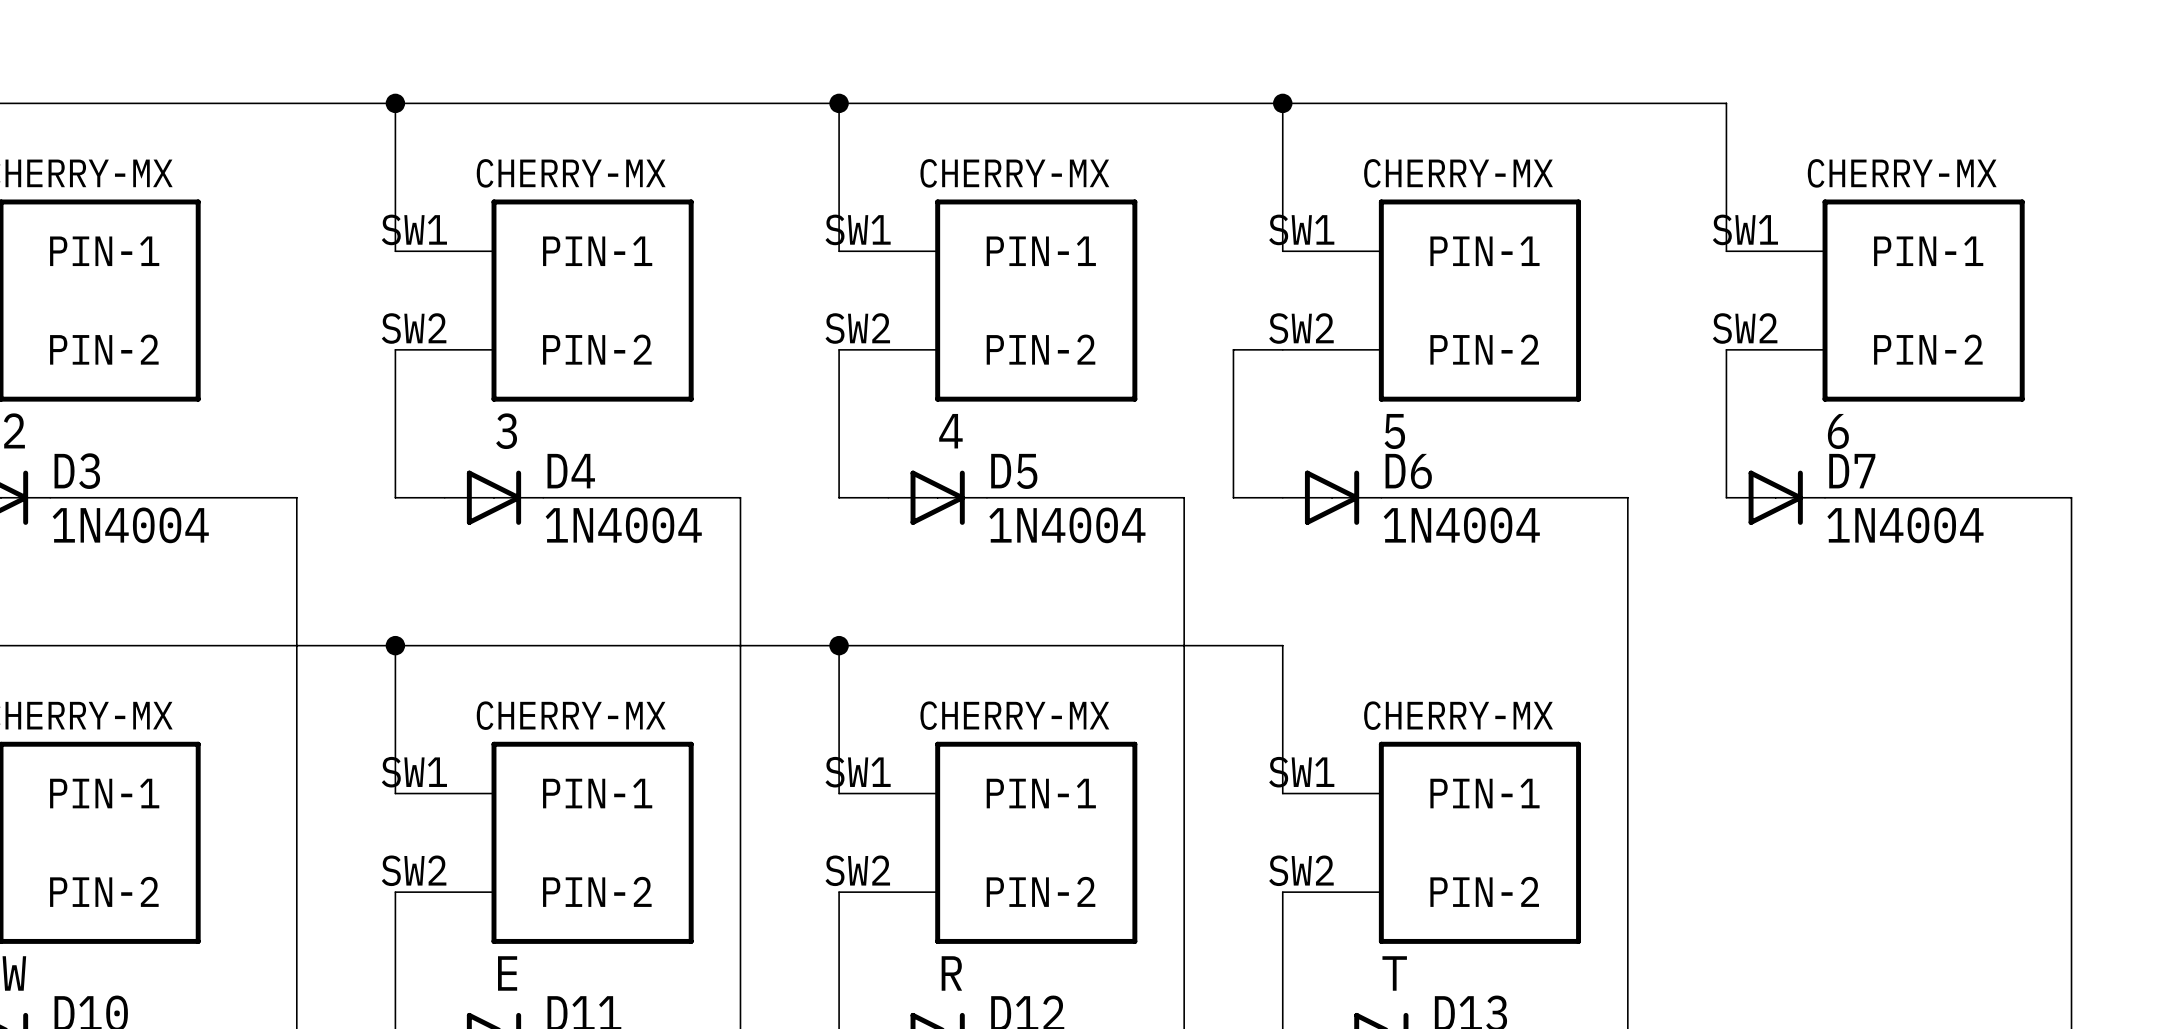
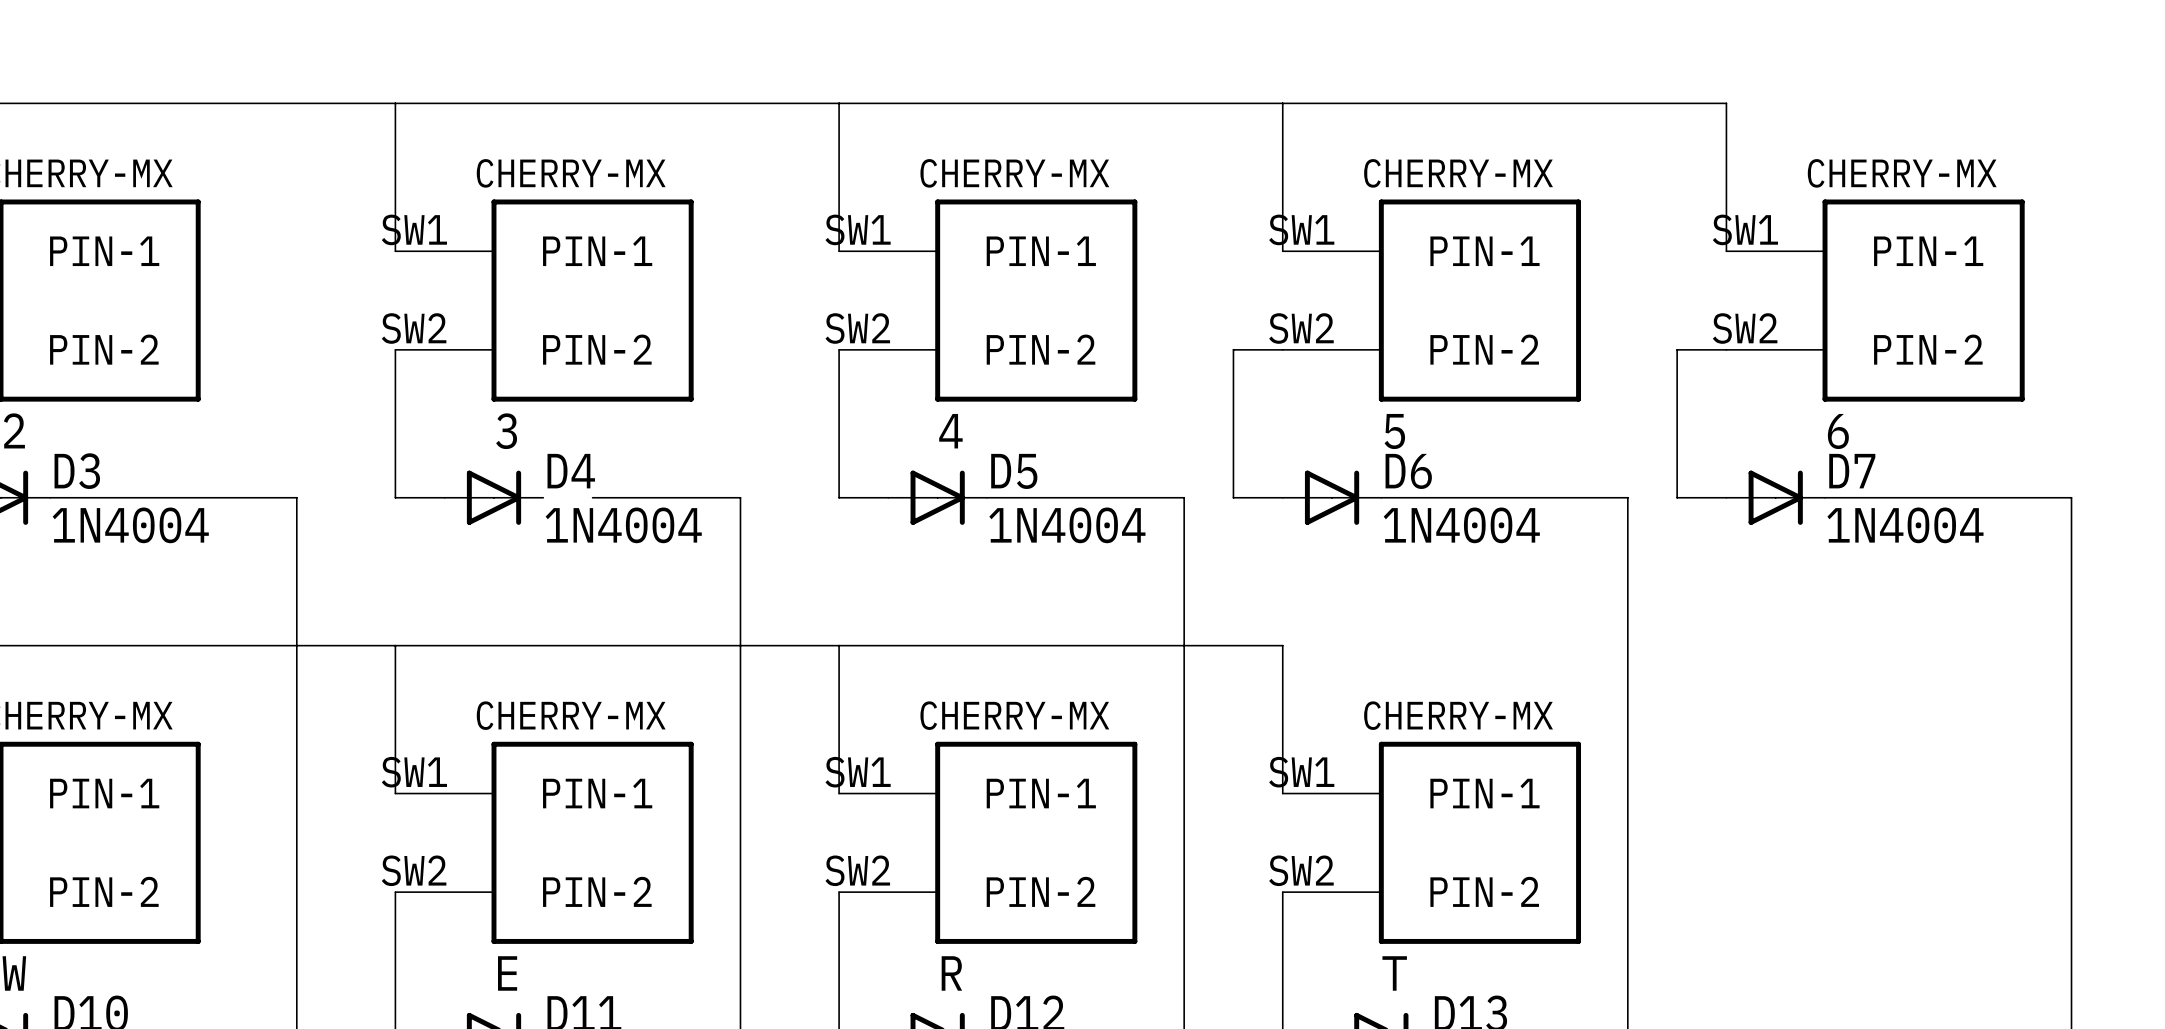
junction: (395, 103) -> none
junction: (839, 103) -> none
junction: (1282, 103) -> none
wire: (1726, 349) (1726, 497) -> (1726, 349) (1677, 349) (1677, 497) (1726, 497)
wire: (543, 497) (592, 497) -> none
junction: (395, 645) -> none
junction: (839, 645) -> none

